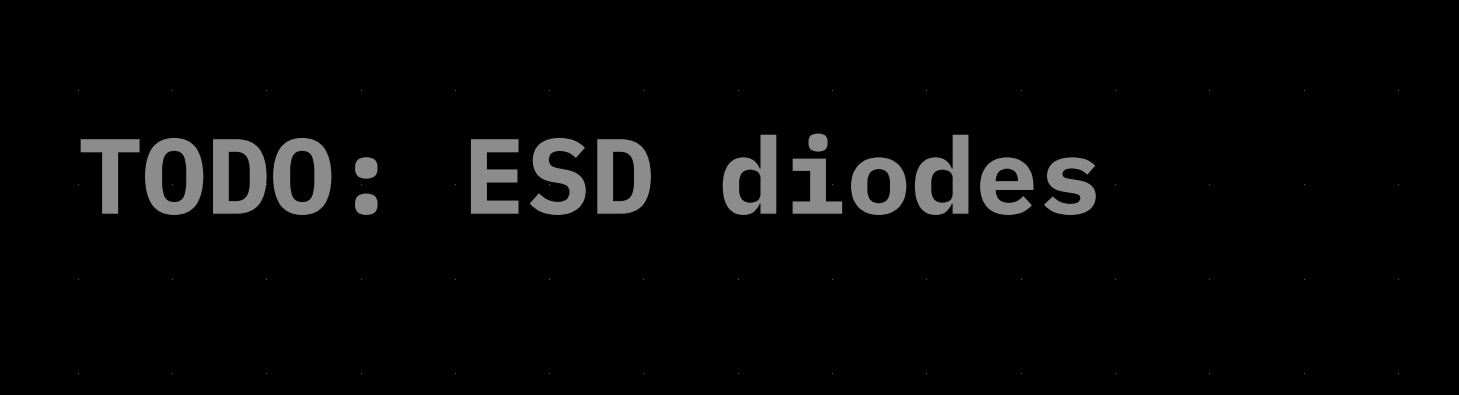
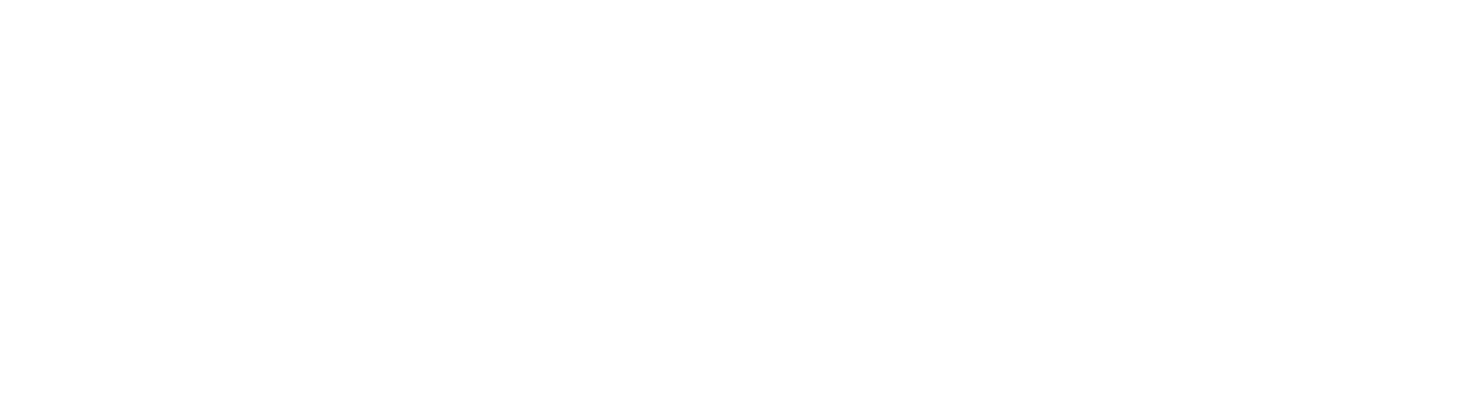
text: TODO: ESD diodes (588, 174) -> none

